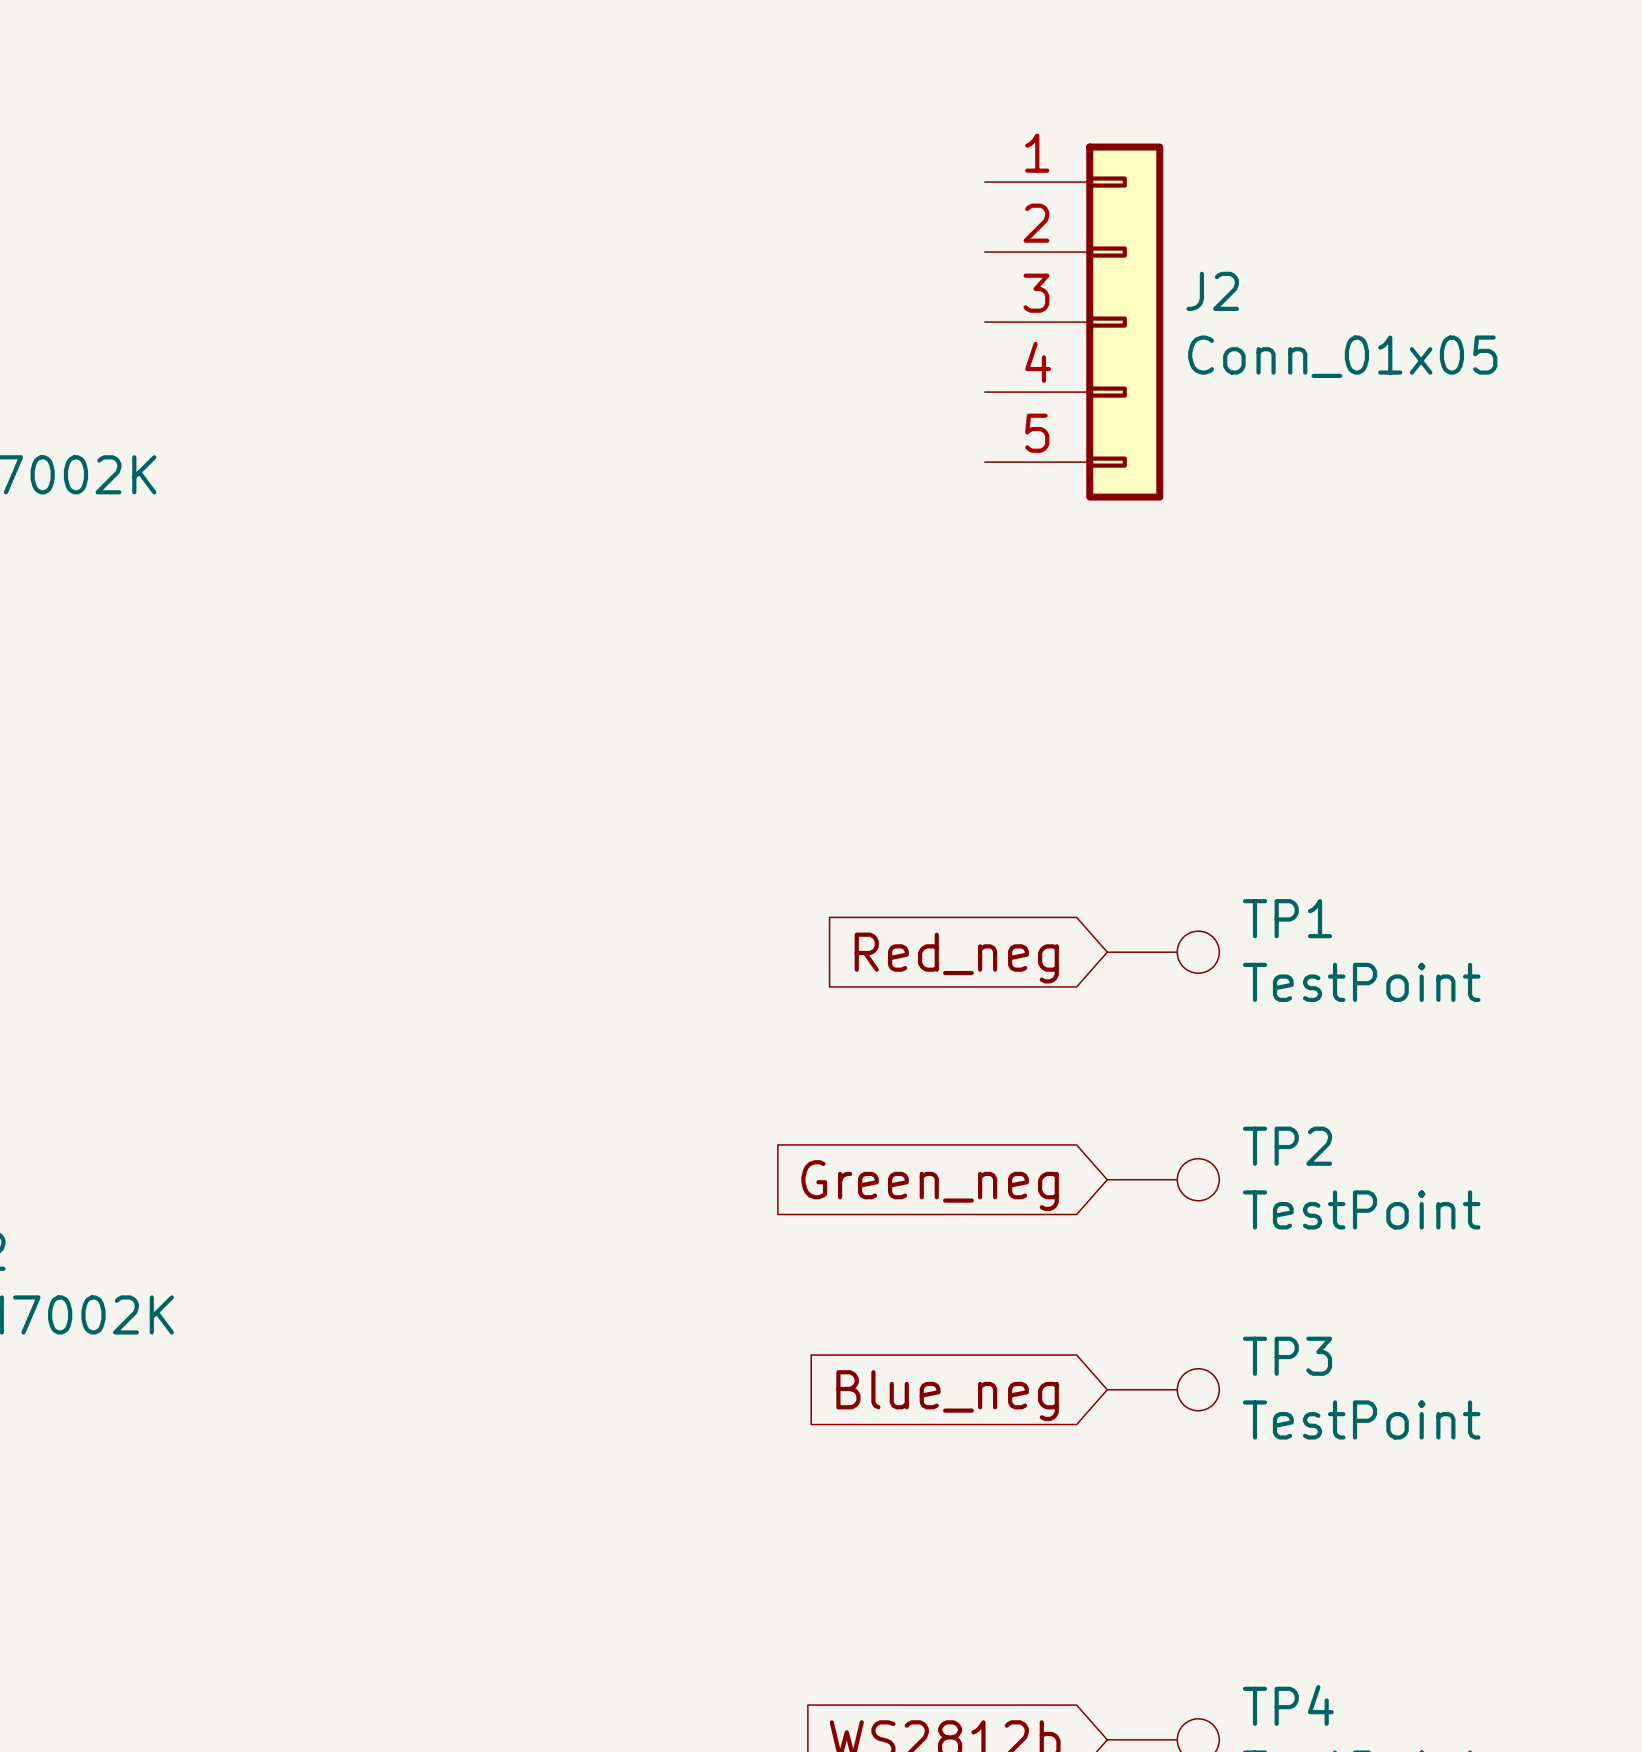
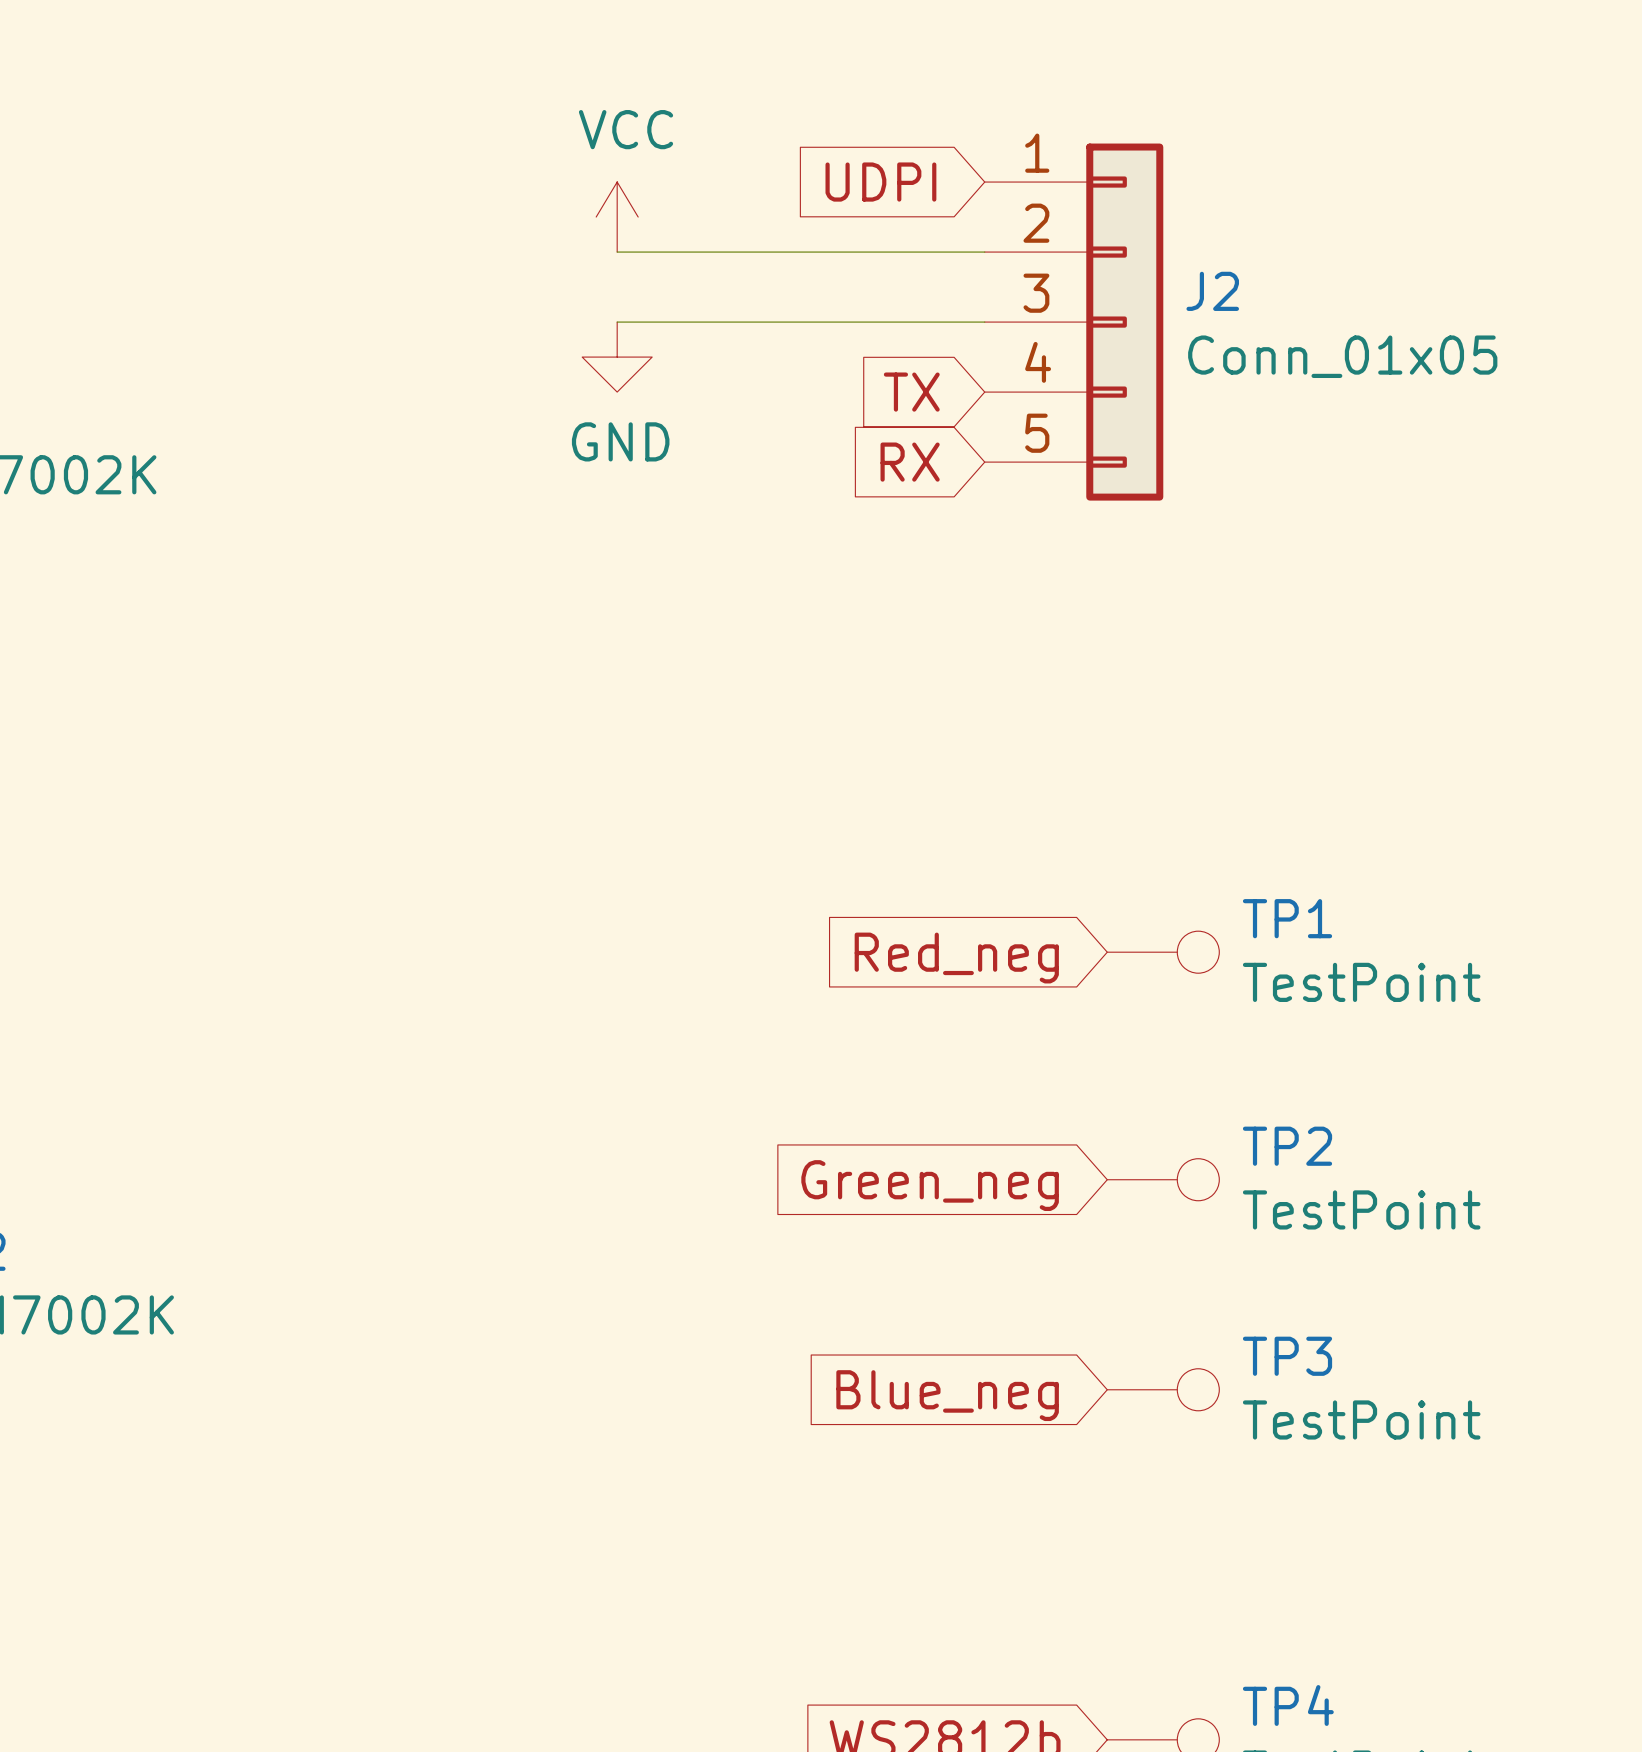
global label: none -> UDPI (880, 182)
power symbol: none -> VCC (617, 217)
wire: none -> (617, 252) (984, 252)
wire: none -> (617, 322) (984, 322)
power symbol: none -> GND (617, 357)
global label: none -> TX (911, 392)
global label: none -> RX (910, 462)

